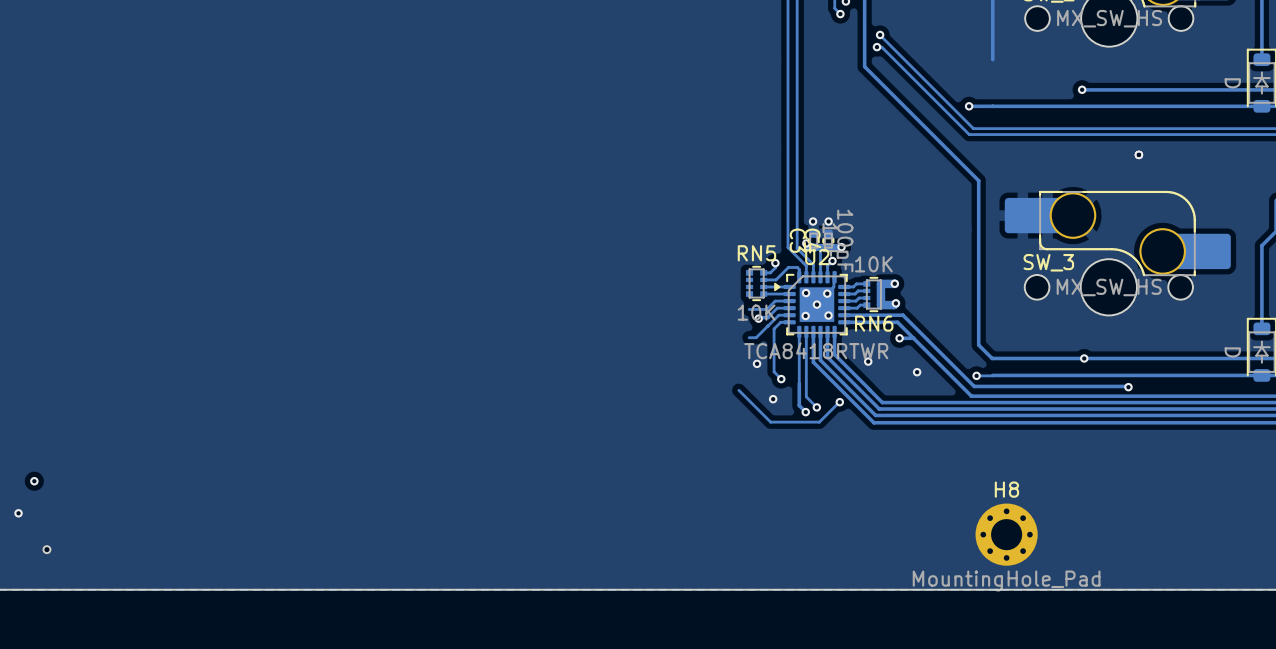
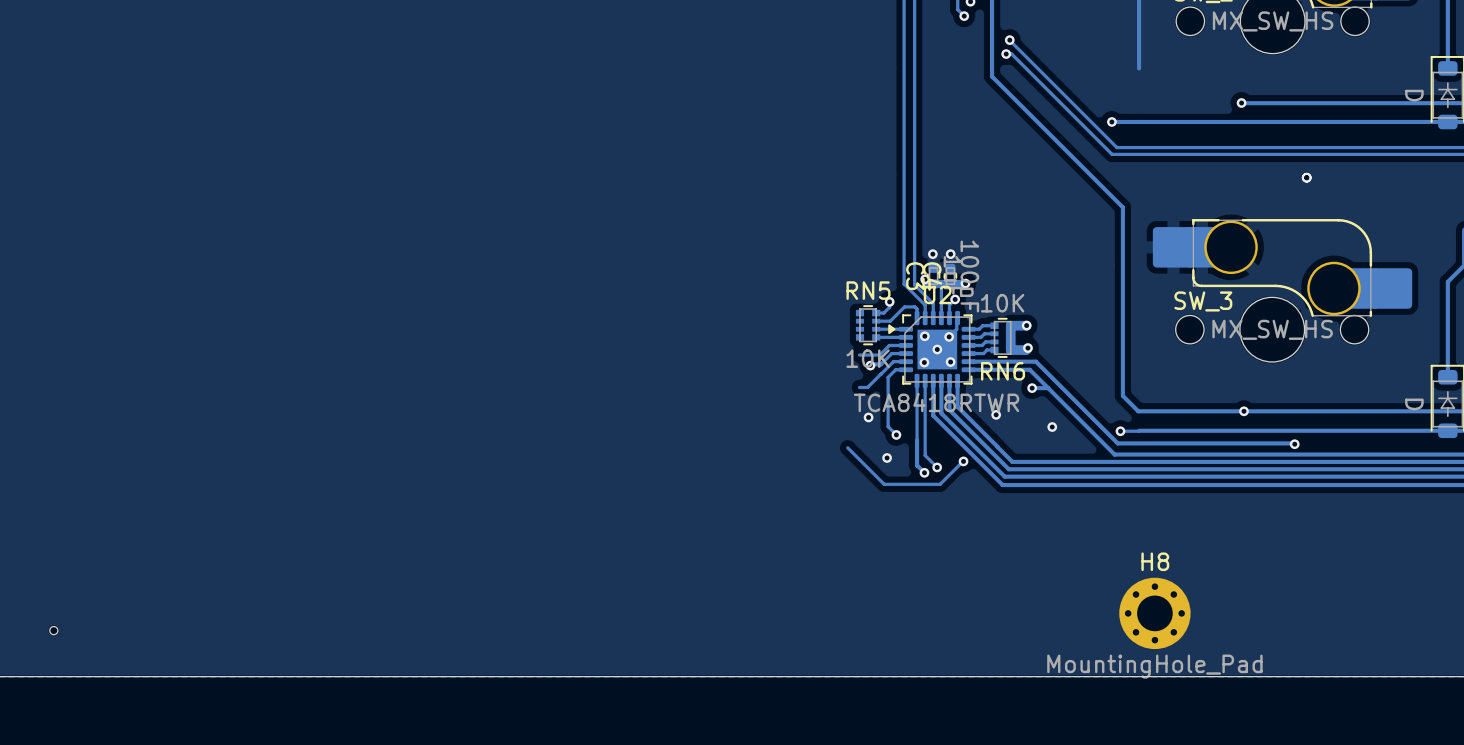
via: (34, 481) -> none
via: (18, 513) -> none

